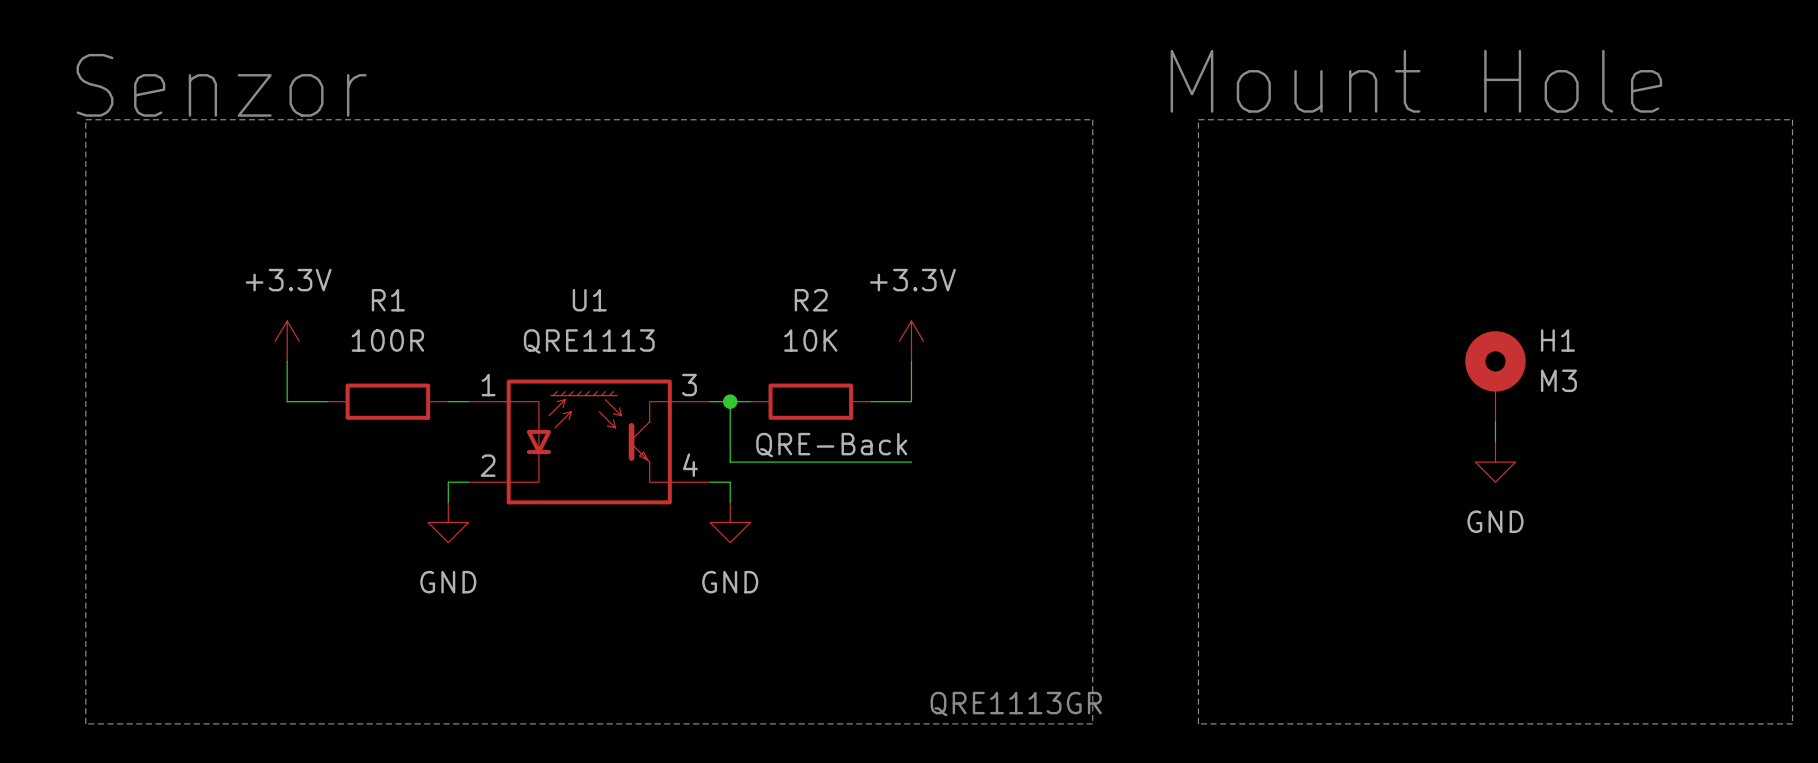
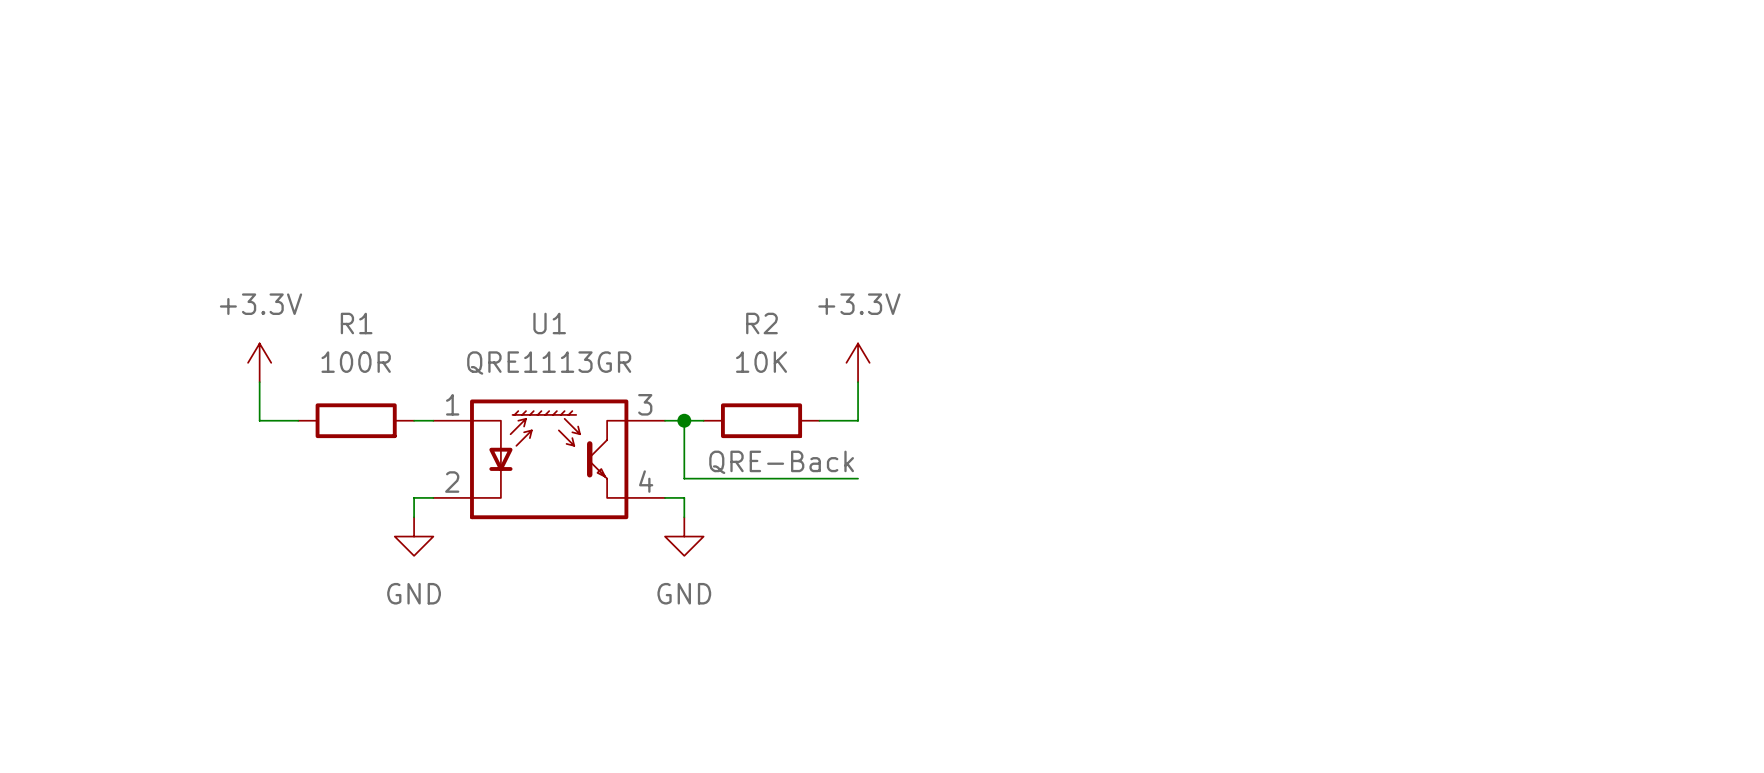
text: Mount Hole (1416, 81) -> none
text: Senzor (221, 85) -> none
line: (85, 119) (1092, 119) (1092, 723) (85, 723) (85, 119) -> none
line: (1198, 119) (1792, 119) (1792, 723) (1198, 723) (1198, 119) -> none
U1 value: QRE1113 (589, 341) -> QRE1113GR (549, 363)
H1: M3 (1495, 376) -> none
wire: (1495, 421) (1495, 441) -> none
power symbol: GND (1495, 462) -> none
text: QRE1113GR (1016, 704) -> none

